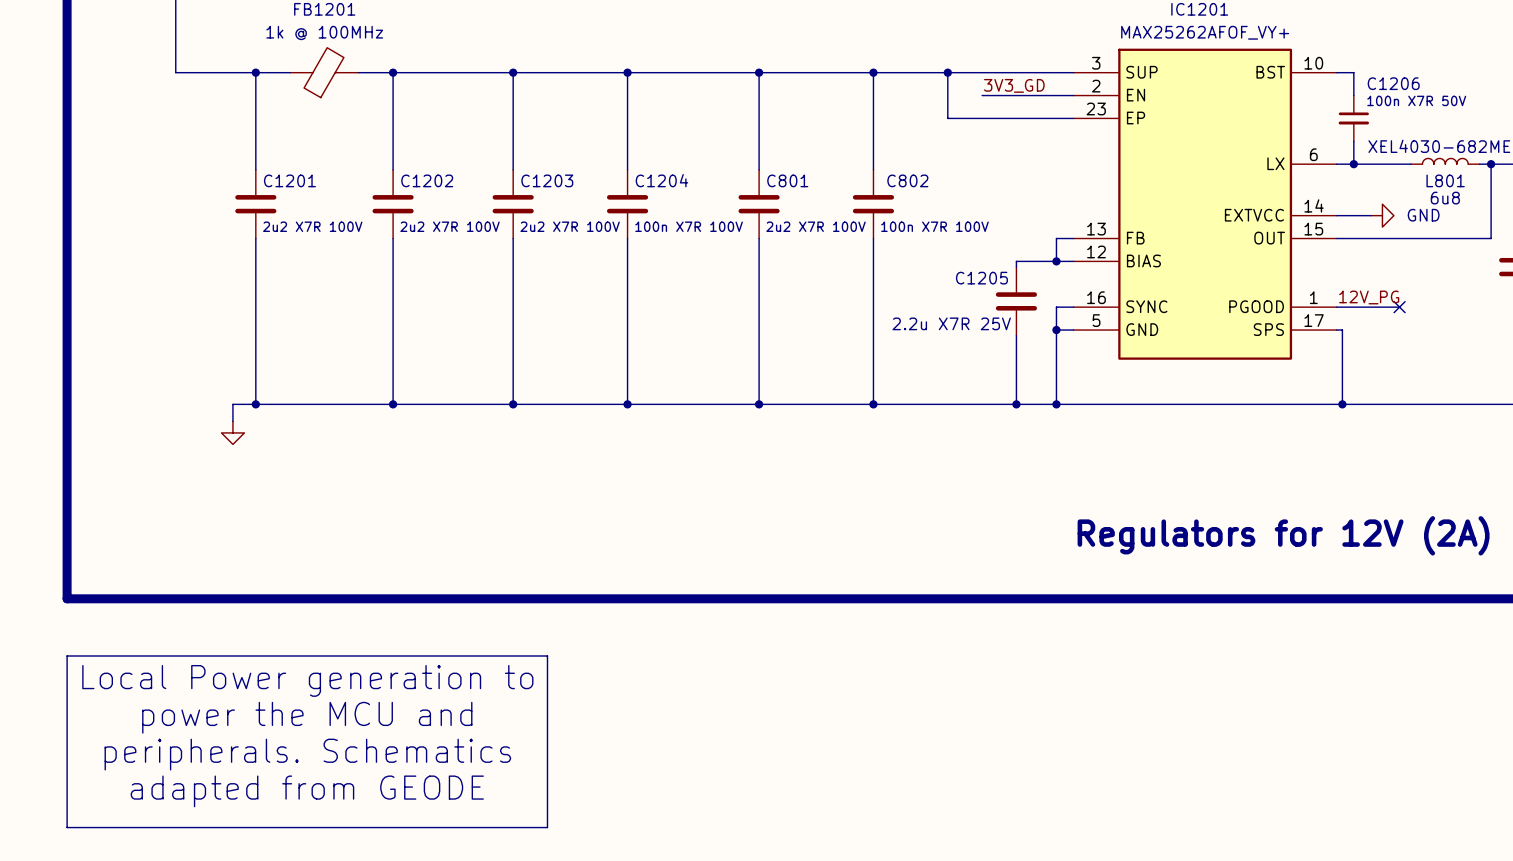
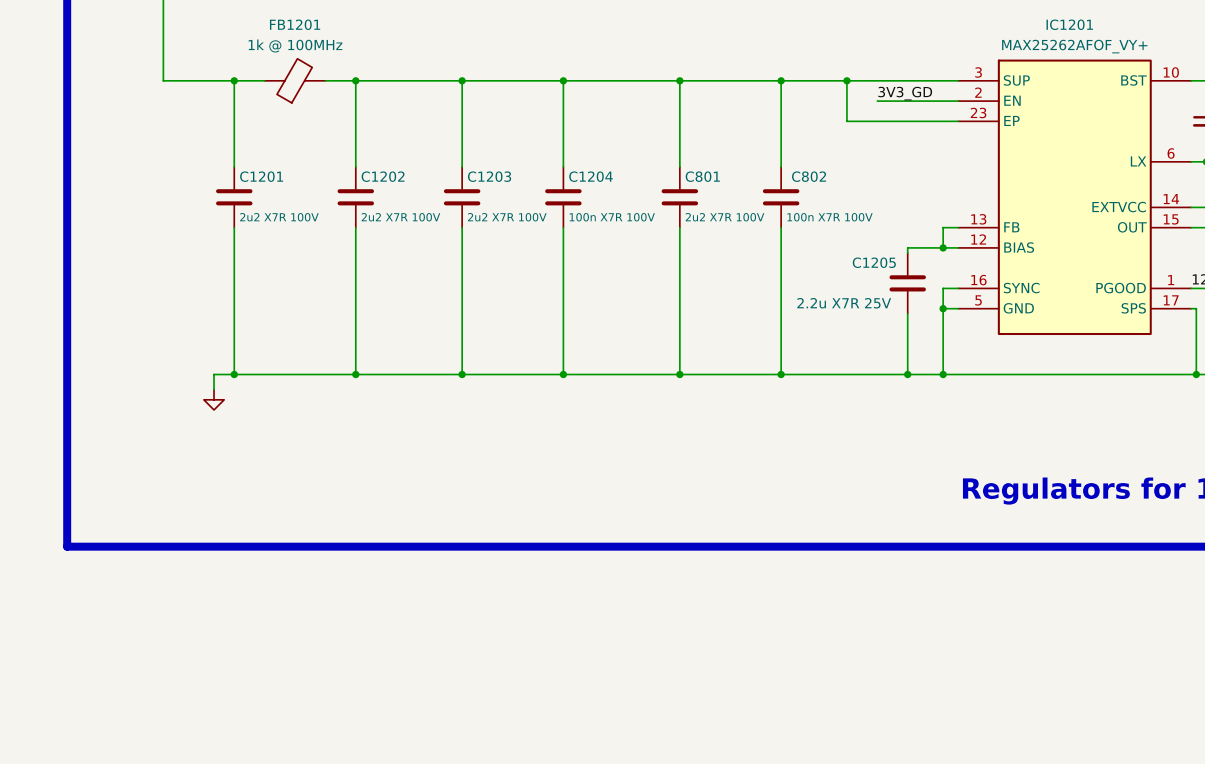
line: (67, 655) (547, 655) (547, 827) (67, 827) (67, 655) -> none
text: Local Power generation to (307, 680) -> none
text: power the MCU and (307, 717) -> none
text: peripherals. Schematics (307, 754) -> none
text: adapted from GEODE (307, 791) -> none

